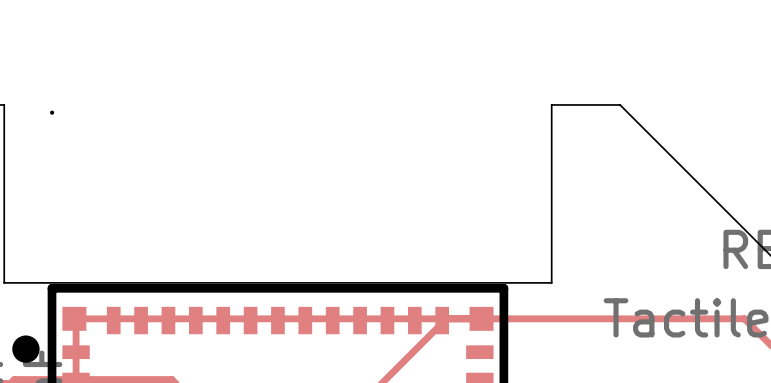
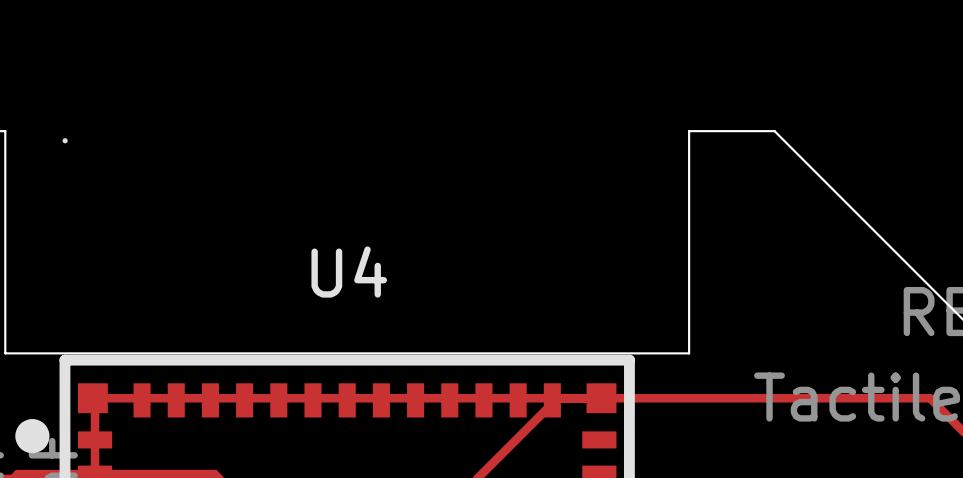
U4 name: none -> U4 (349, 272)

